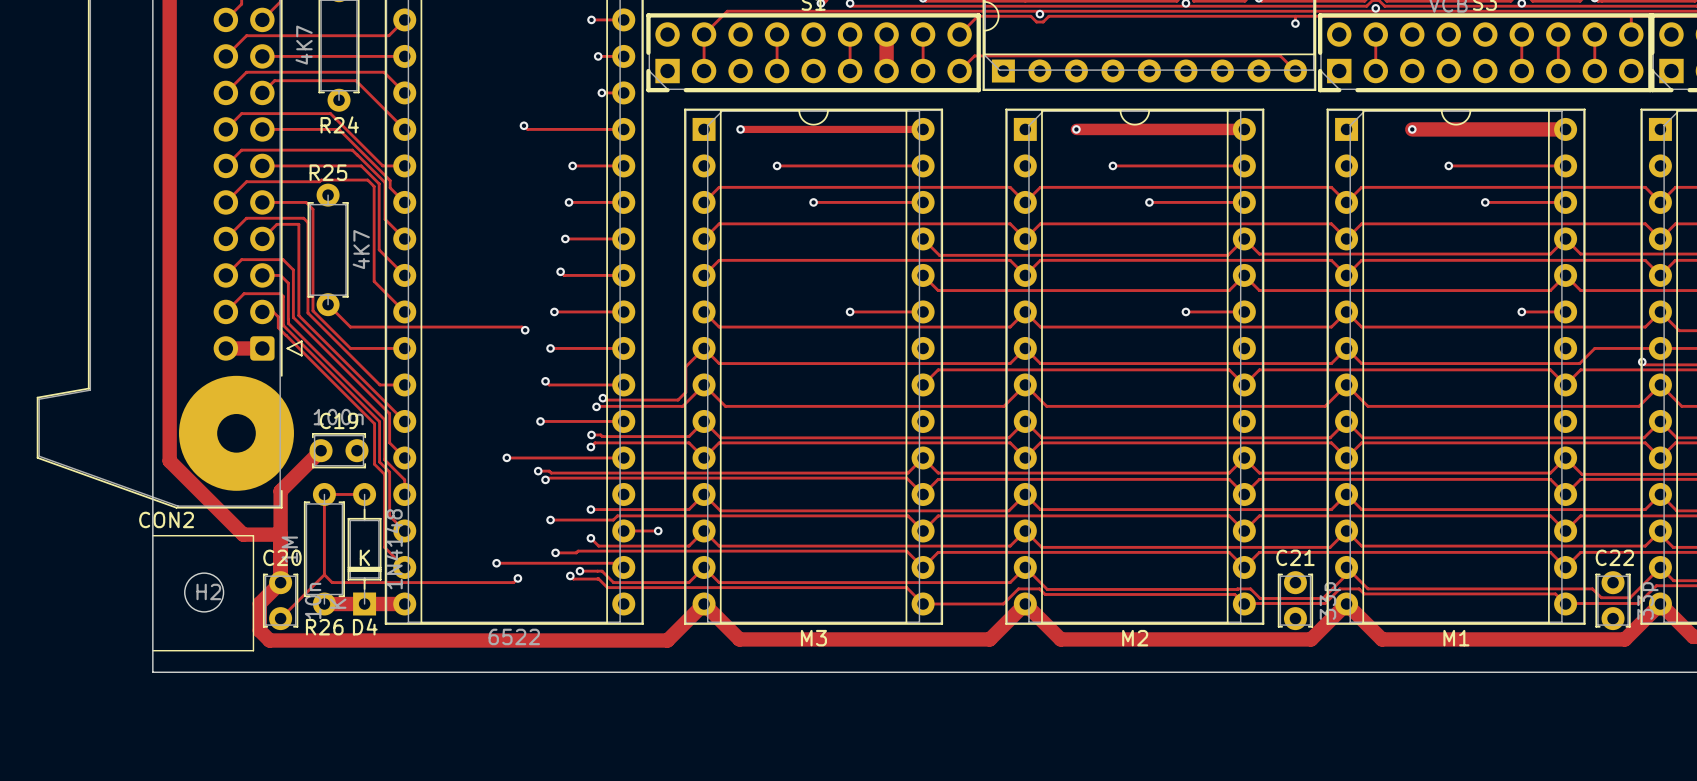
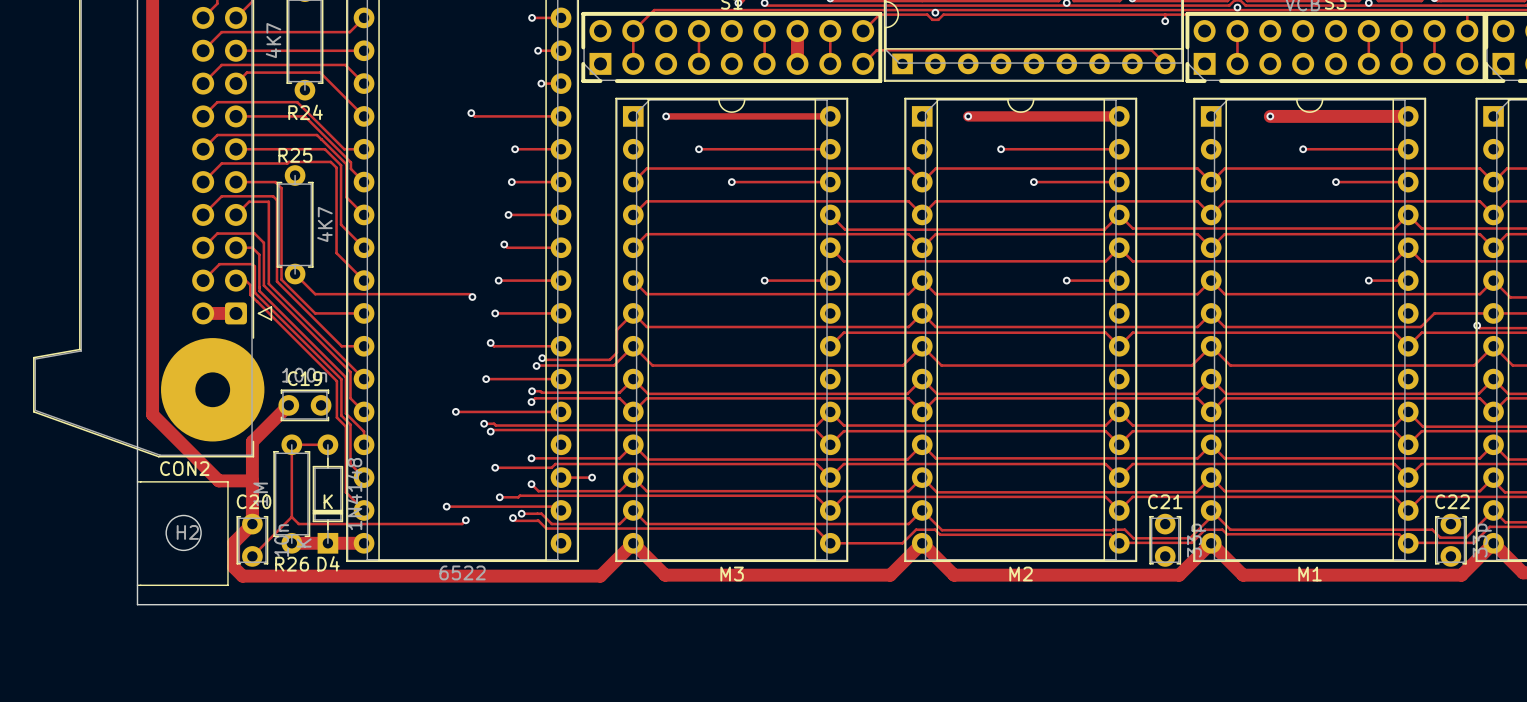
CON2 name position: CON2 (166, 519) -> CON2 (184, 468)

